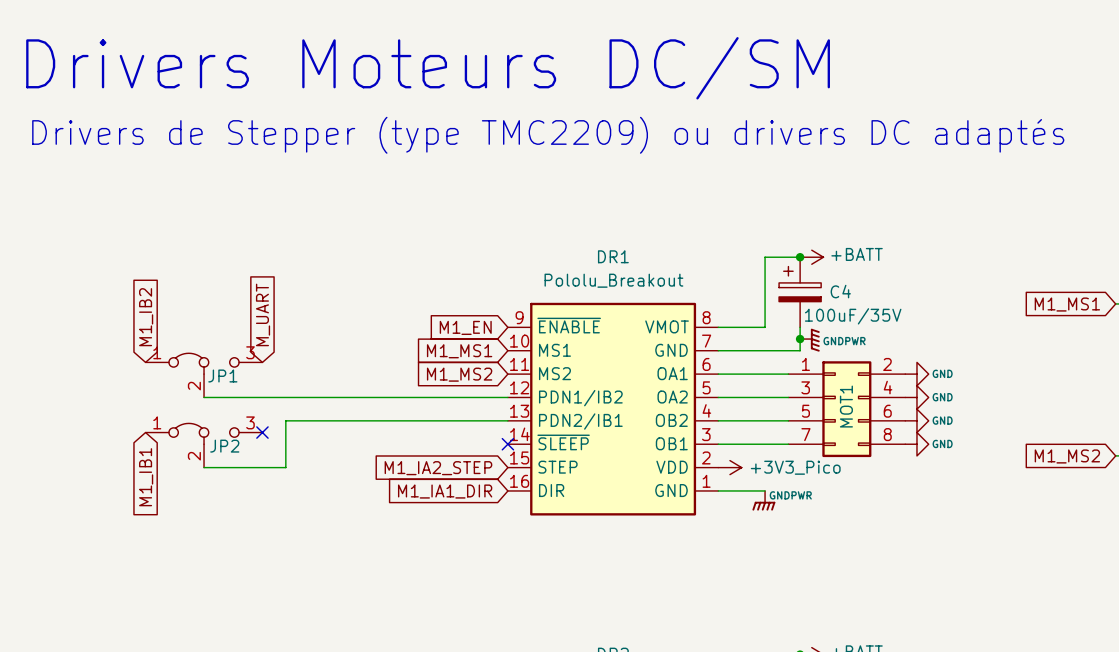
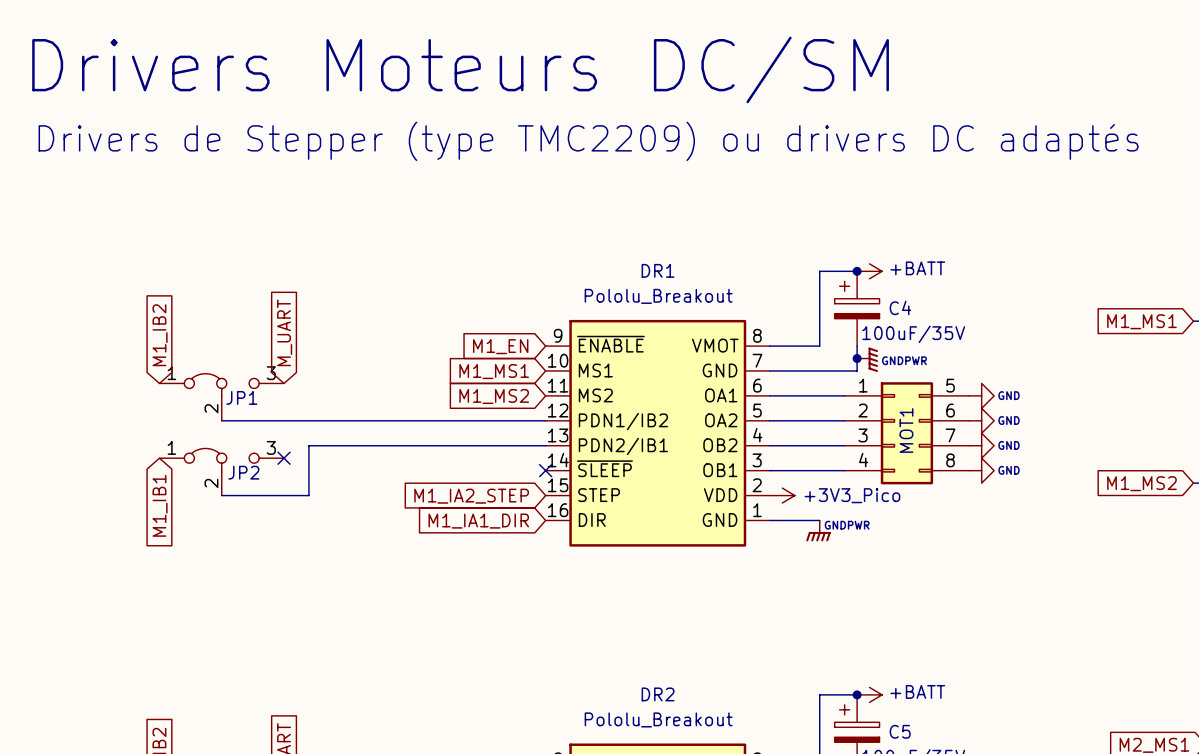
MOT1 pin number: 2 (887, 364) -> 5 (950, 385)
MOT1 pin number: 3 (805, 387) -> 2 (863, 410)
MOT1 pin number: 4 (888, 387) -> 6 (950, 410)
MOT1 pin number: 5 (805, 411) -> 3 (863, 435)
MOT1 pin number: 6 (887, 411) -> 7 (950, 435)
MOT1 pin number: 7 (805, 434) -> 4 (863, 460)

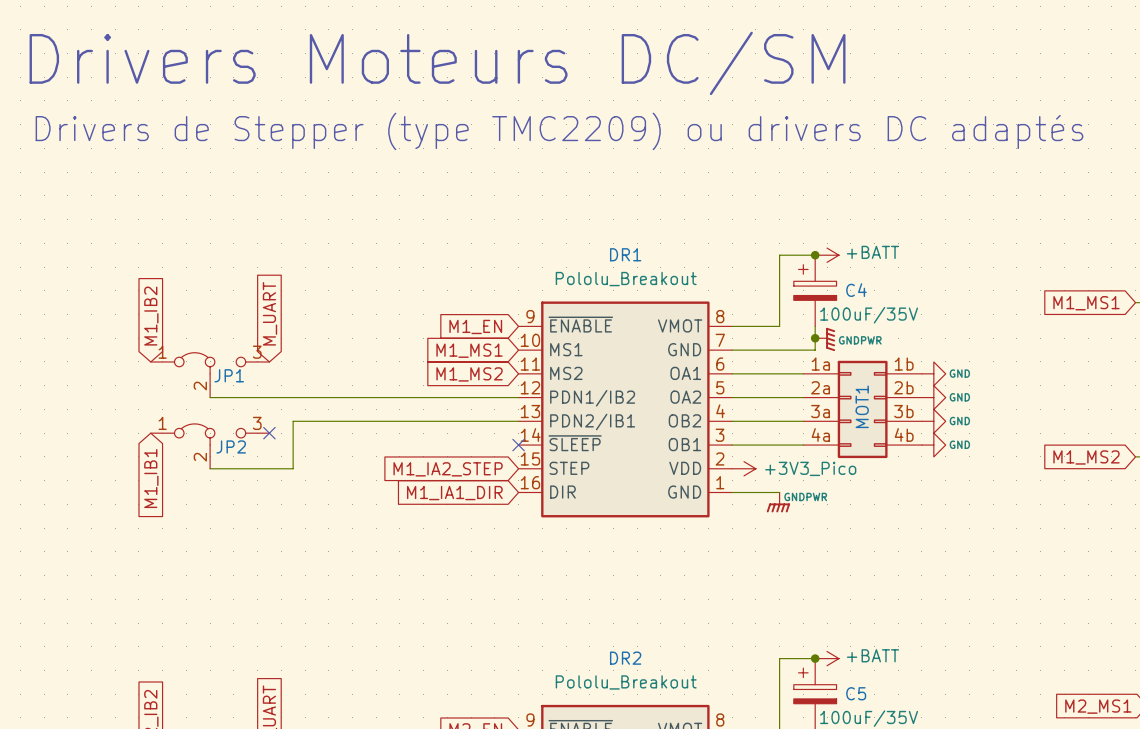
MOT1 pin number: 1 (863, 385) -> 1a (820, 364)
MOT1 pin number: 5 (950, 385) -> 1b (904, 364)
MOT1 pin number: 2 (863, 410) -> 2a (820, 387)
MOT1 pin number: 6 (950, 410) -> 2b (903, 387)
MOT1 pin number: 3 (863, 435) -> 3a (820, 411)
MOT1 pin number: 7 (950, 435) -> 3b (903, 411)
MOT1 pin number: 4 (863, 460) -> 4a (820, 434)
MOT1 pin number: 8 (950, 460) -> 4b (904, 434)

